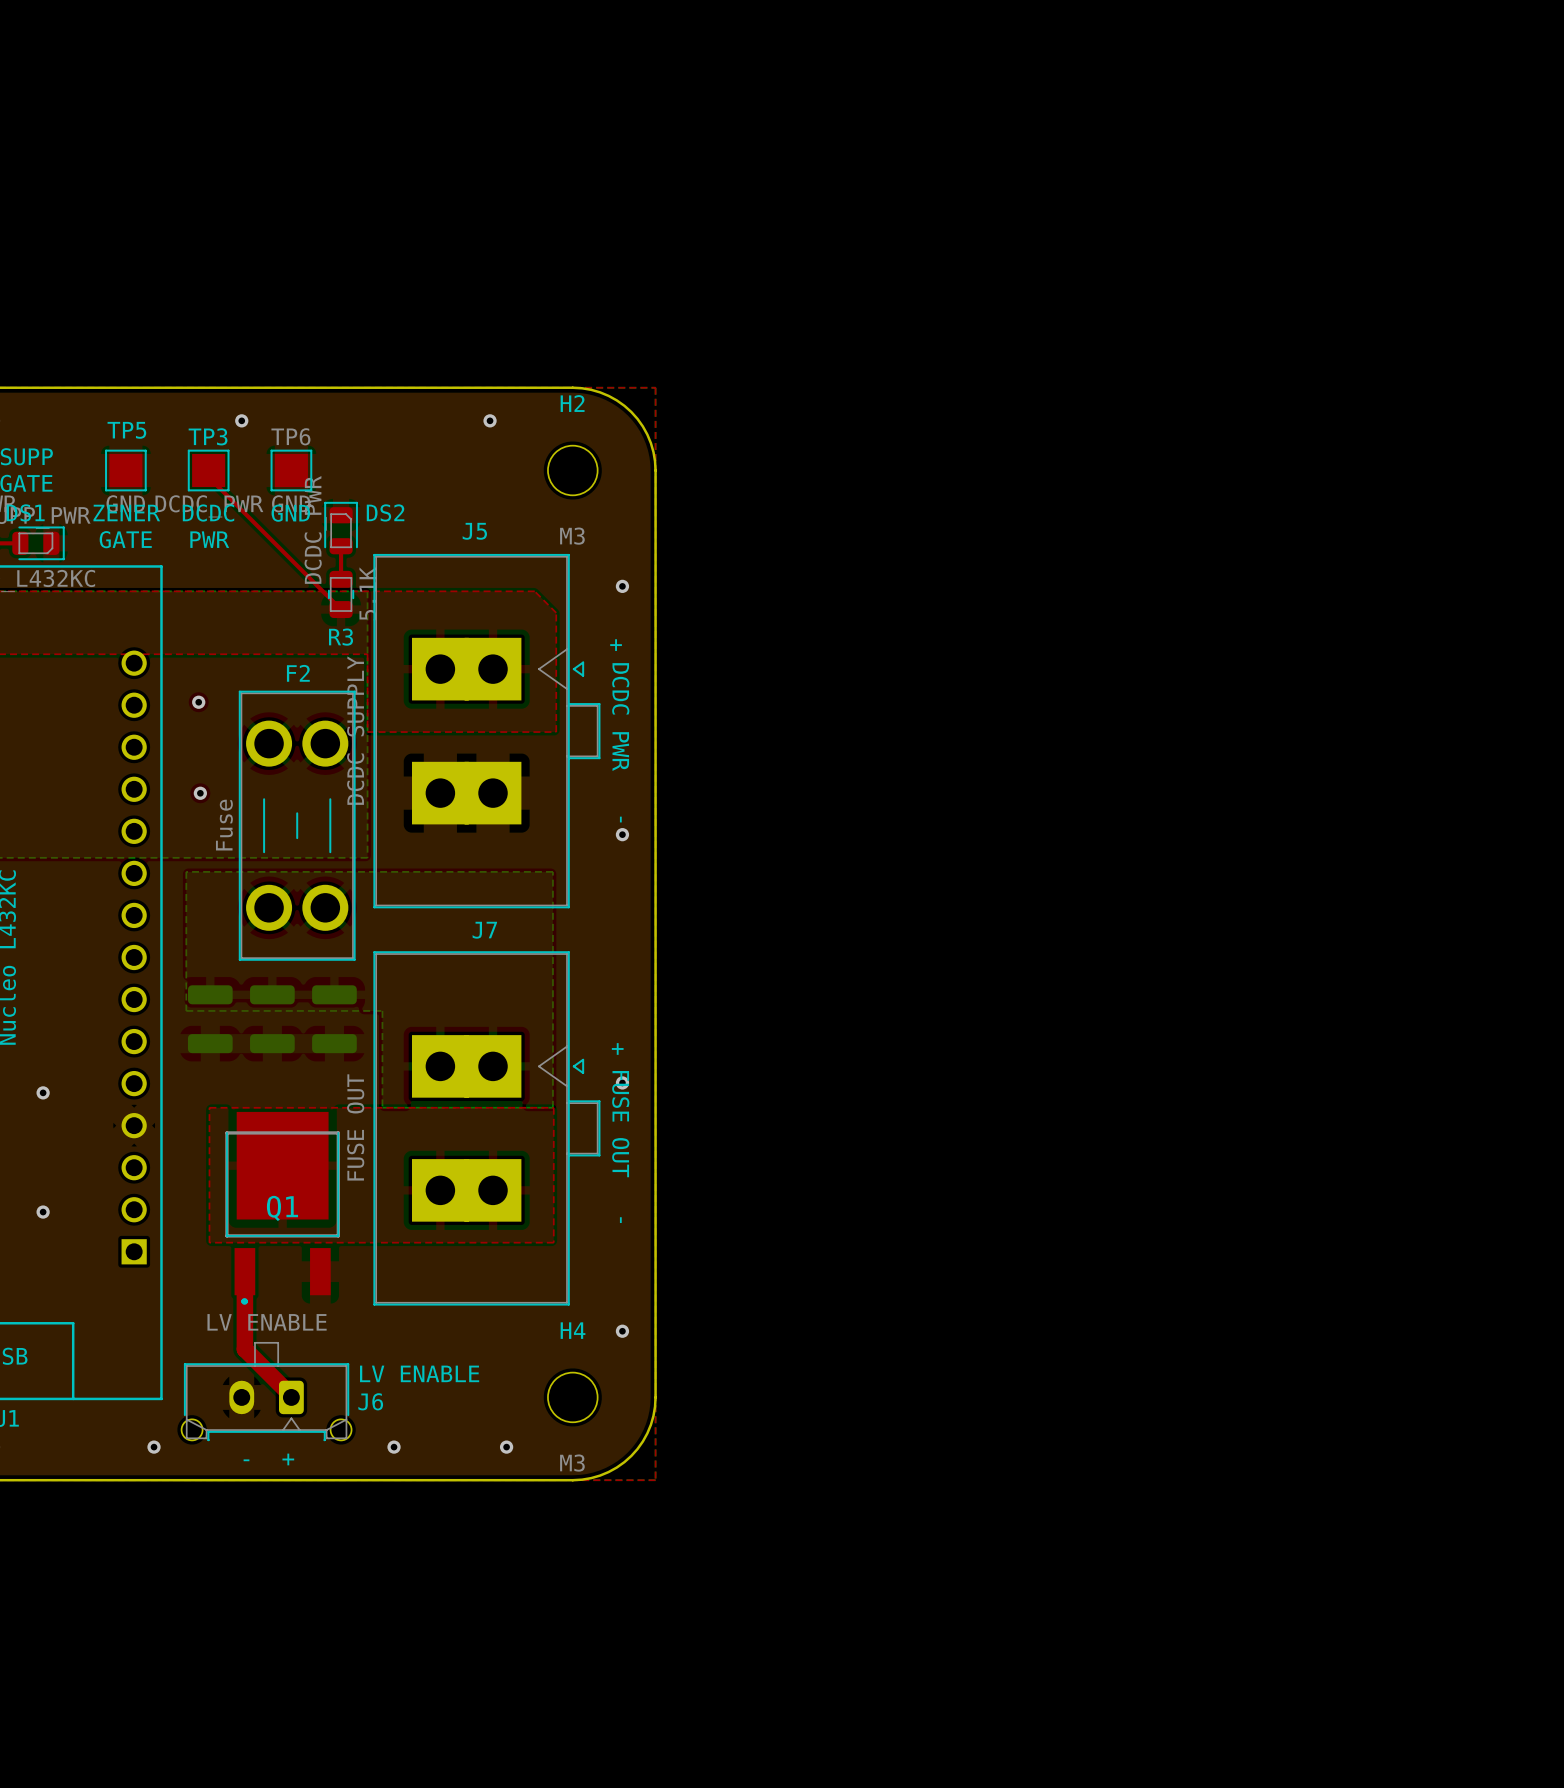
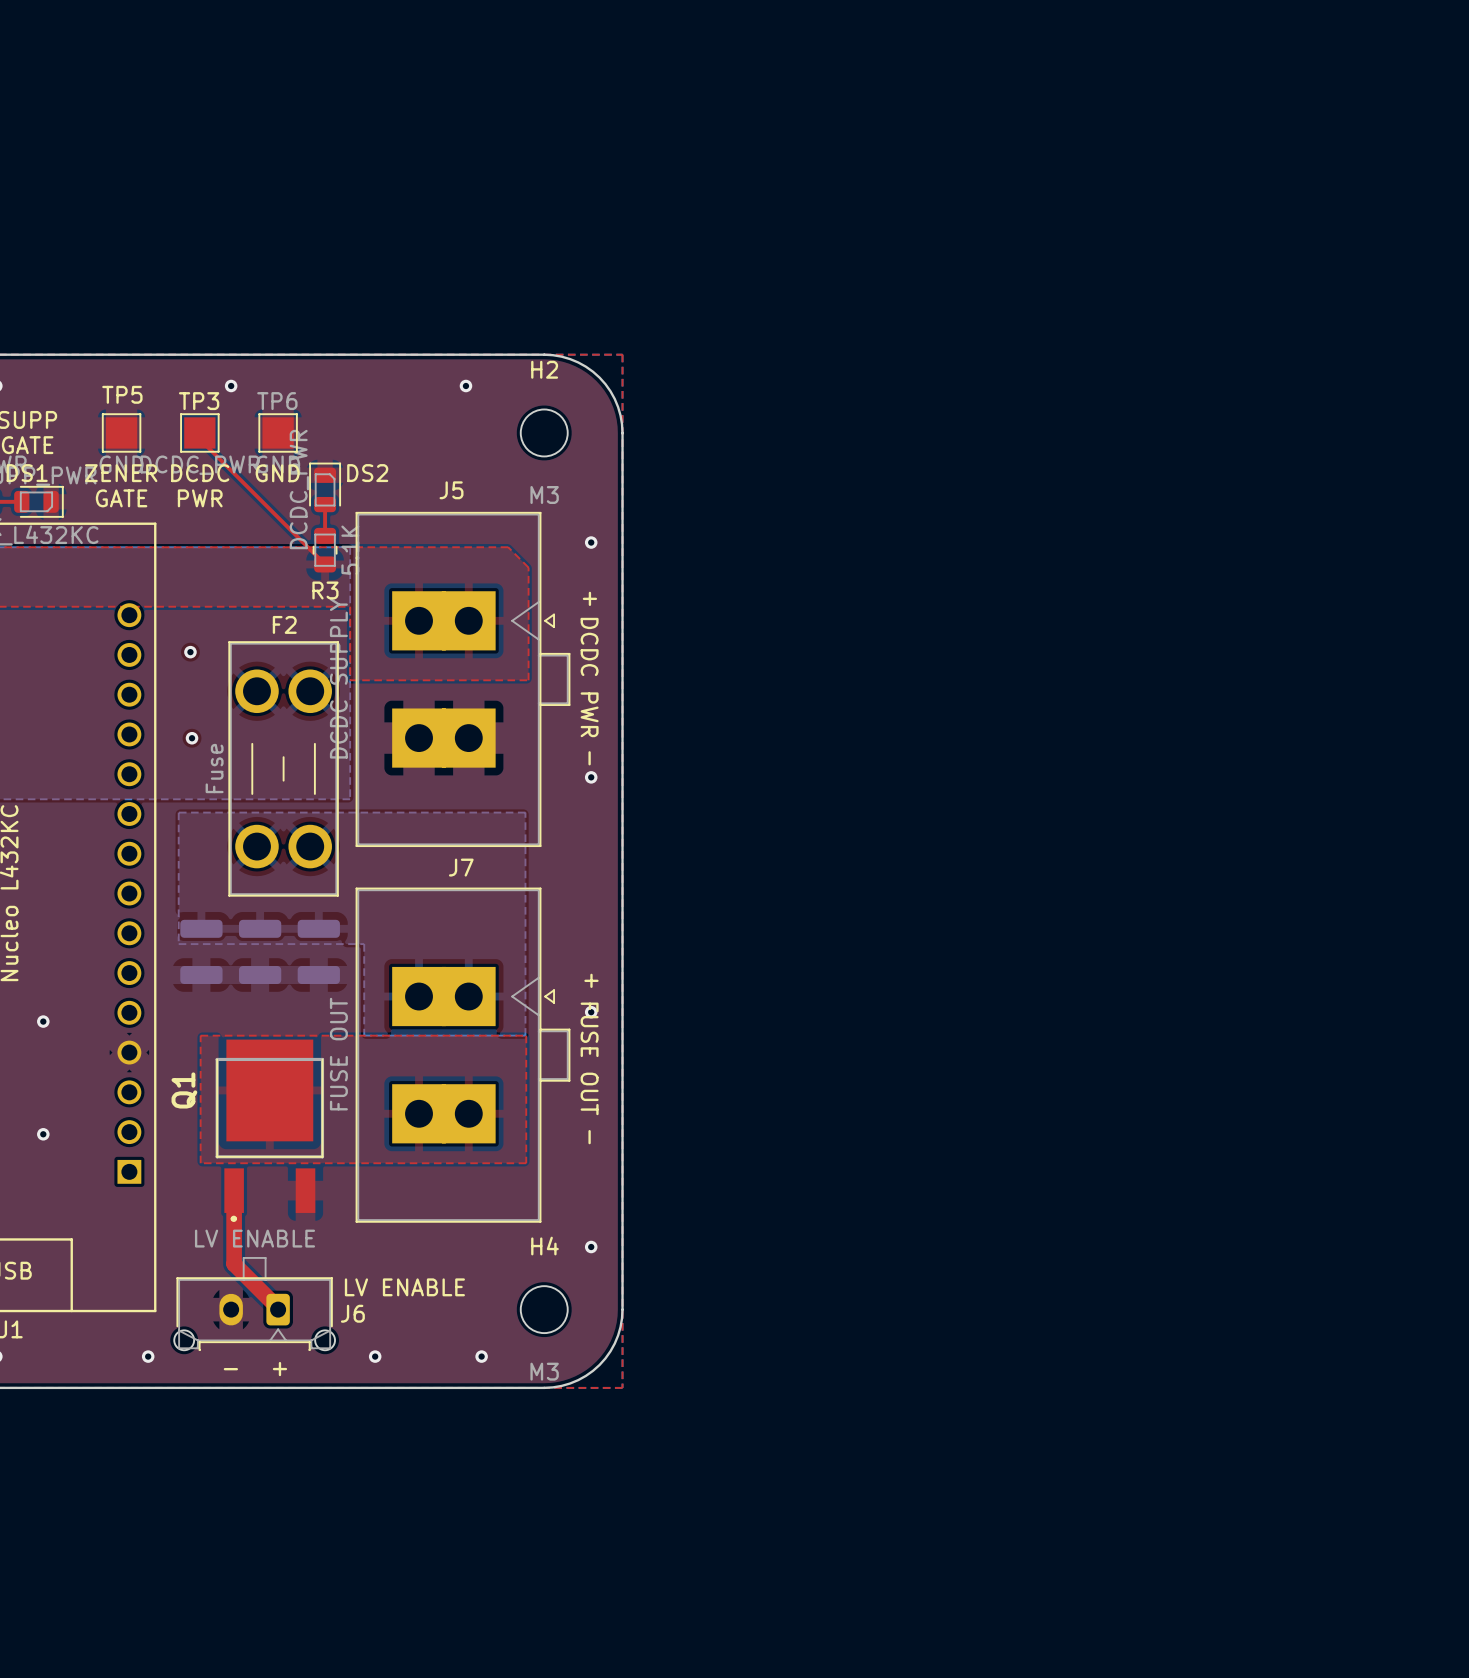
Q1 name rotation: 0° (282, 1208) -> 90° counterclockwise (184, 1090)
Q1 name position: Q1 (282, 1208) -> Q1 (184, 1090)

